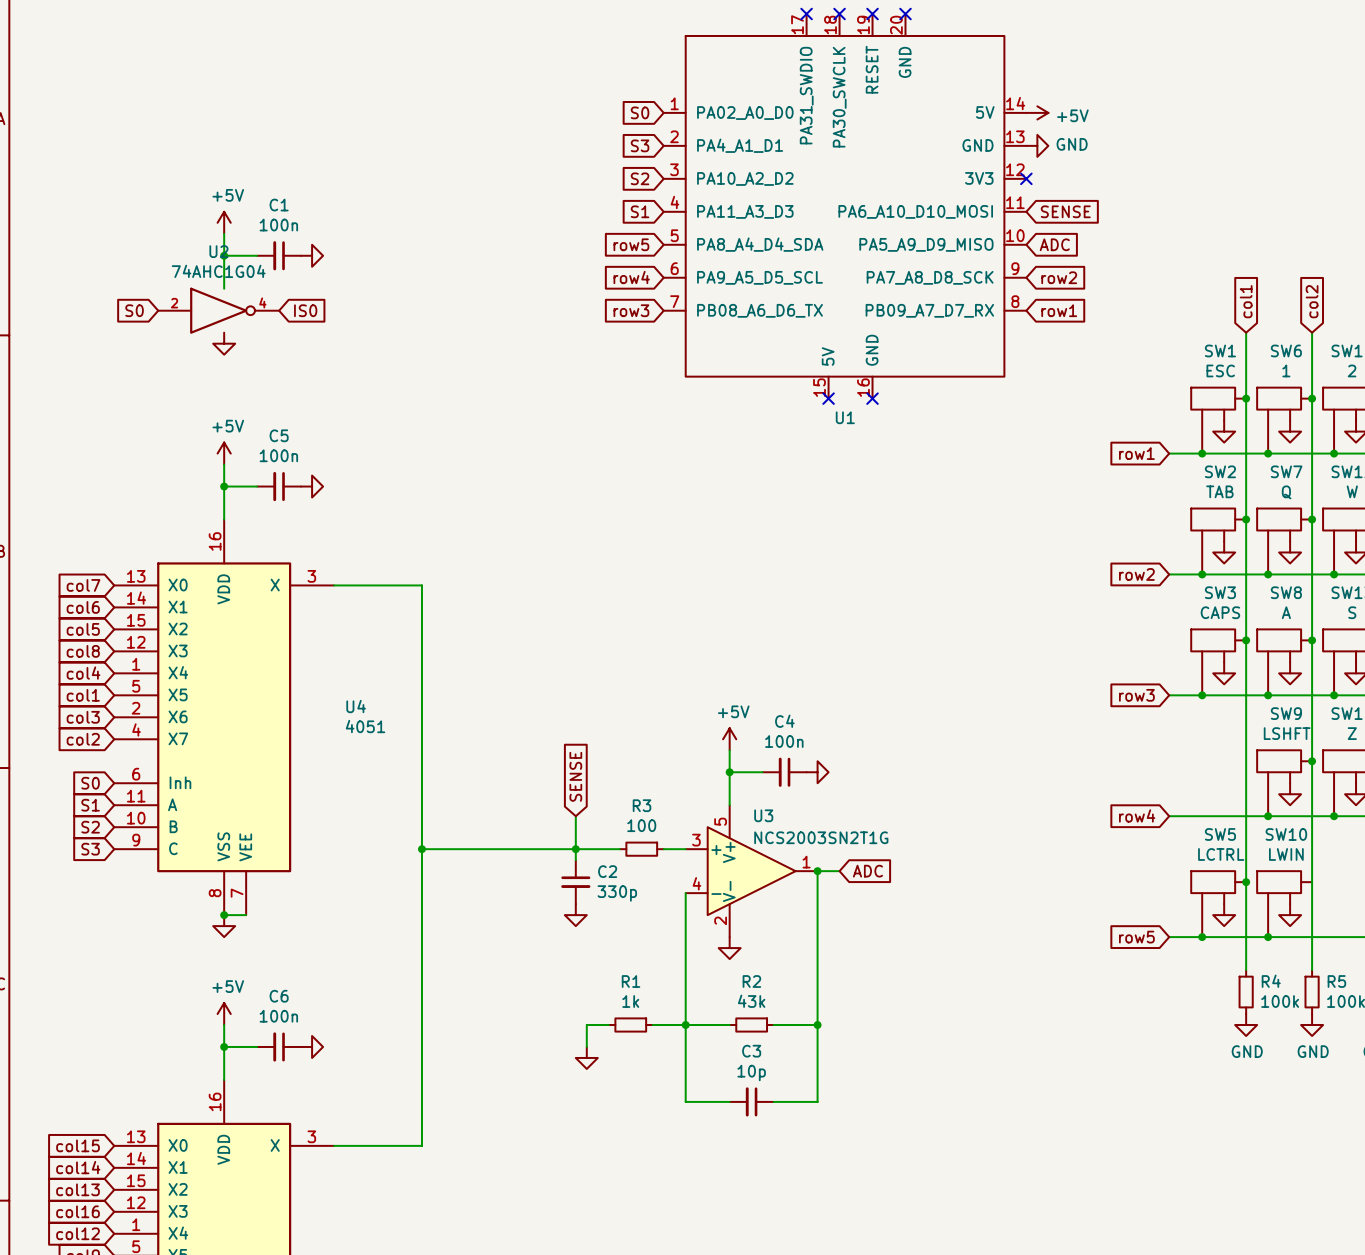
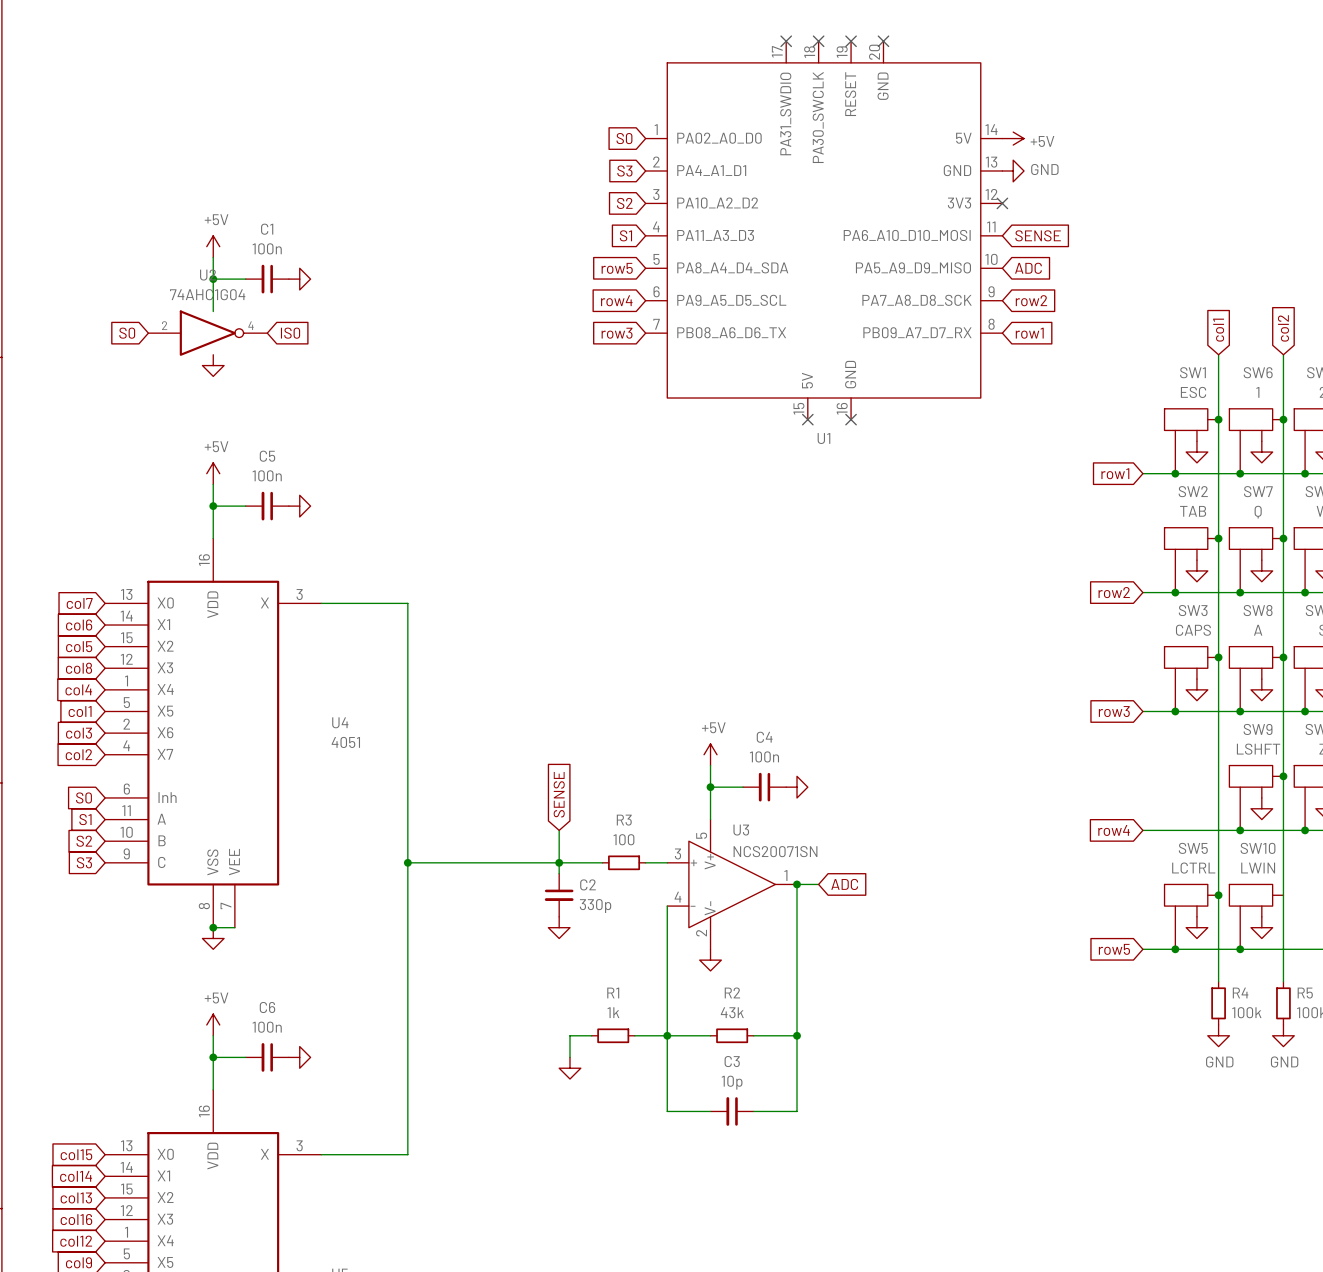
U3 value: NCS2003SN2T1G (821, 837) -> NCS20071SN (775, 851)

